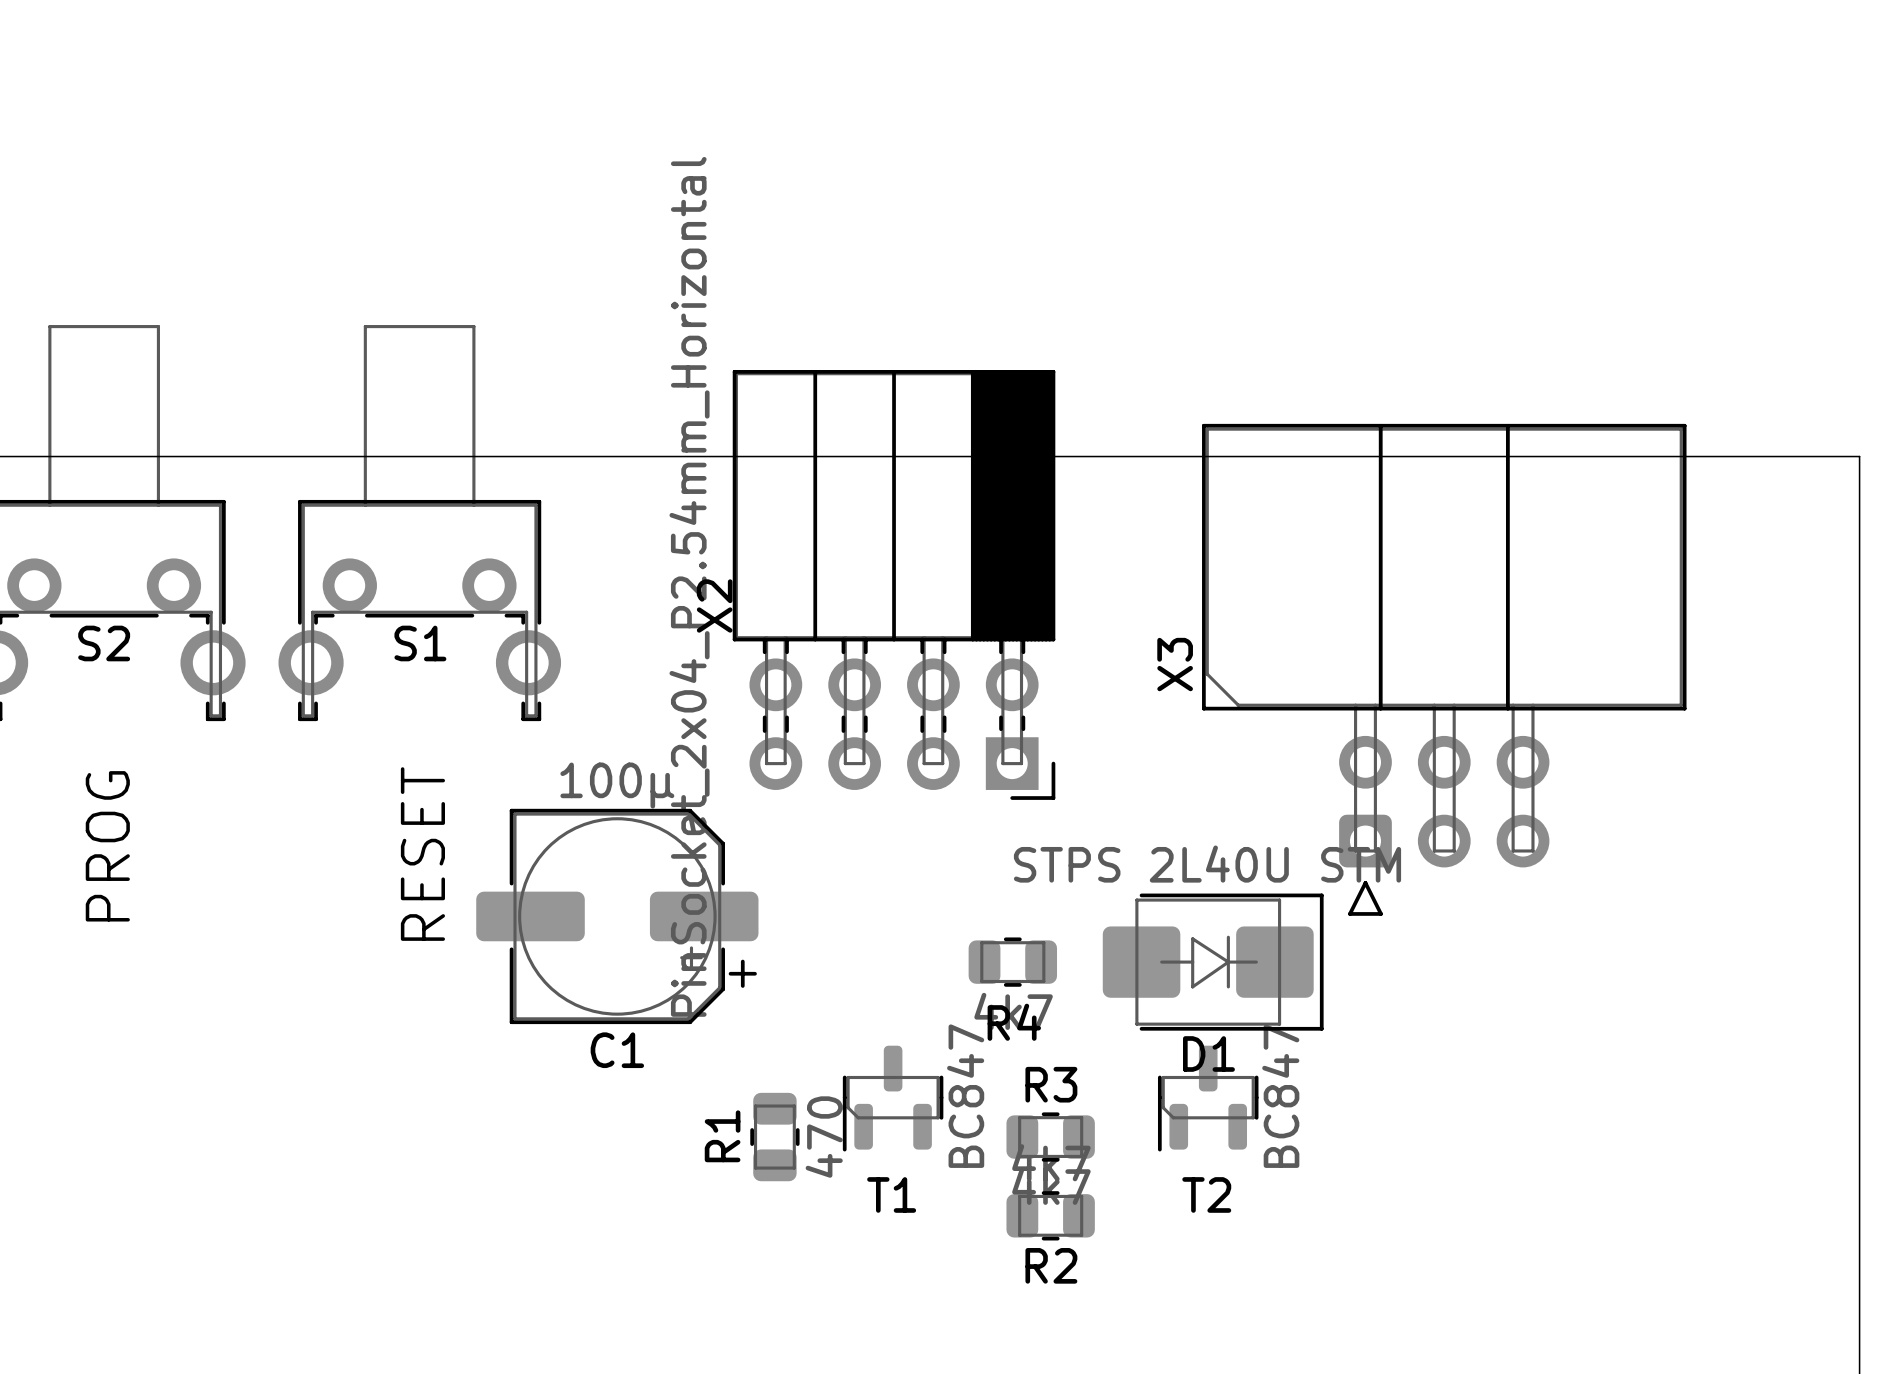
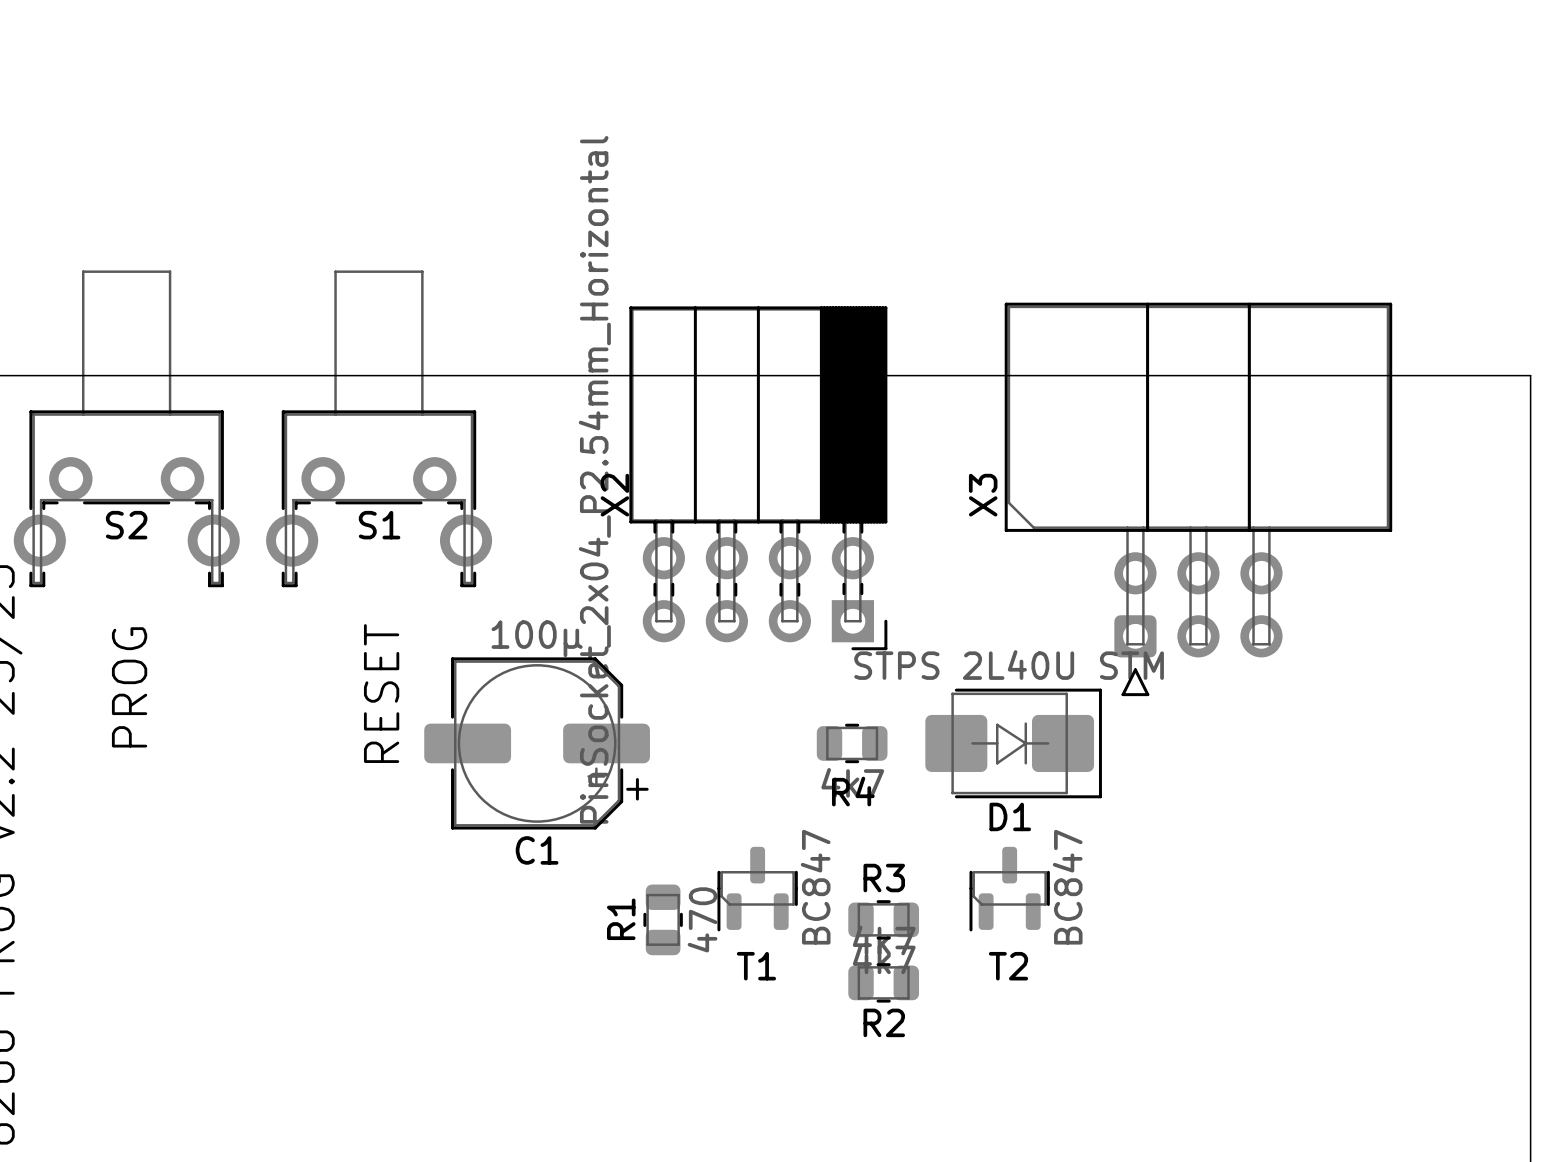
X3 position: (1444, 669) -> (1198, 499)
R4 position: (1012, 962) -> (852, 743)
D1 position: (1213, 962) -> (1013, 743)

